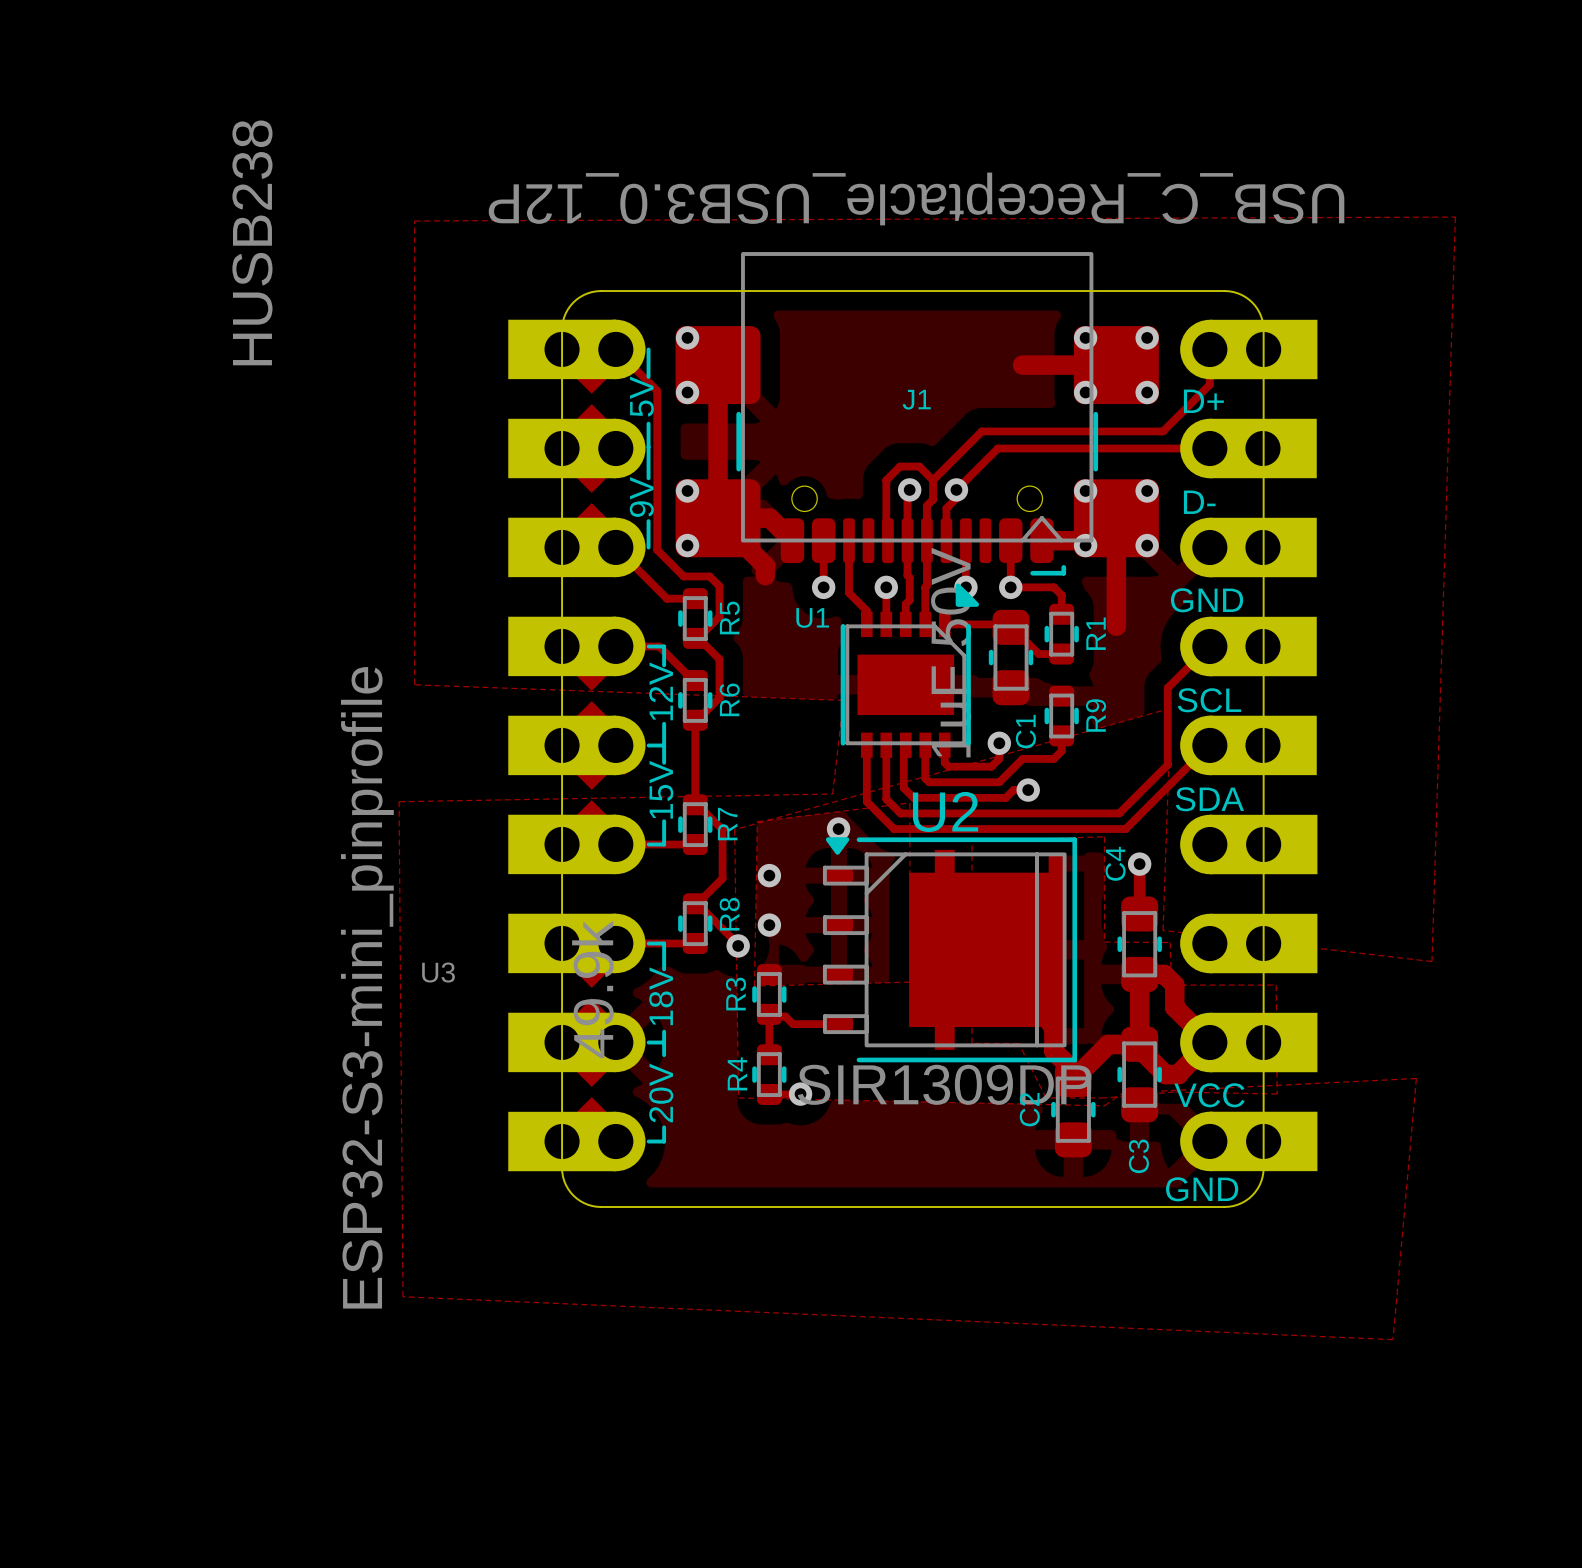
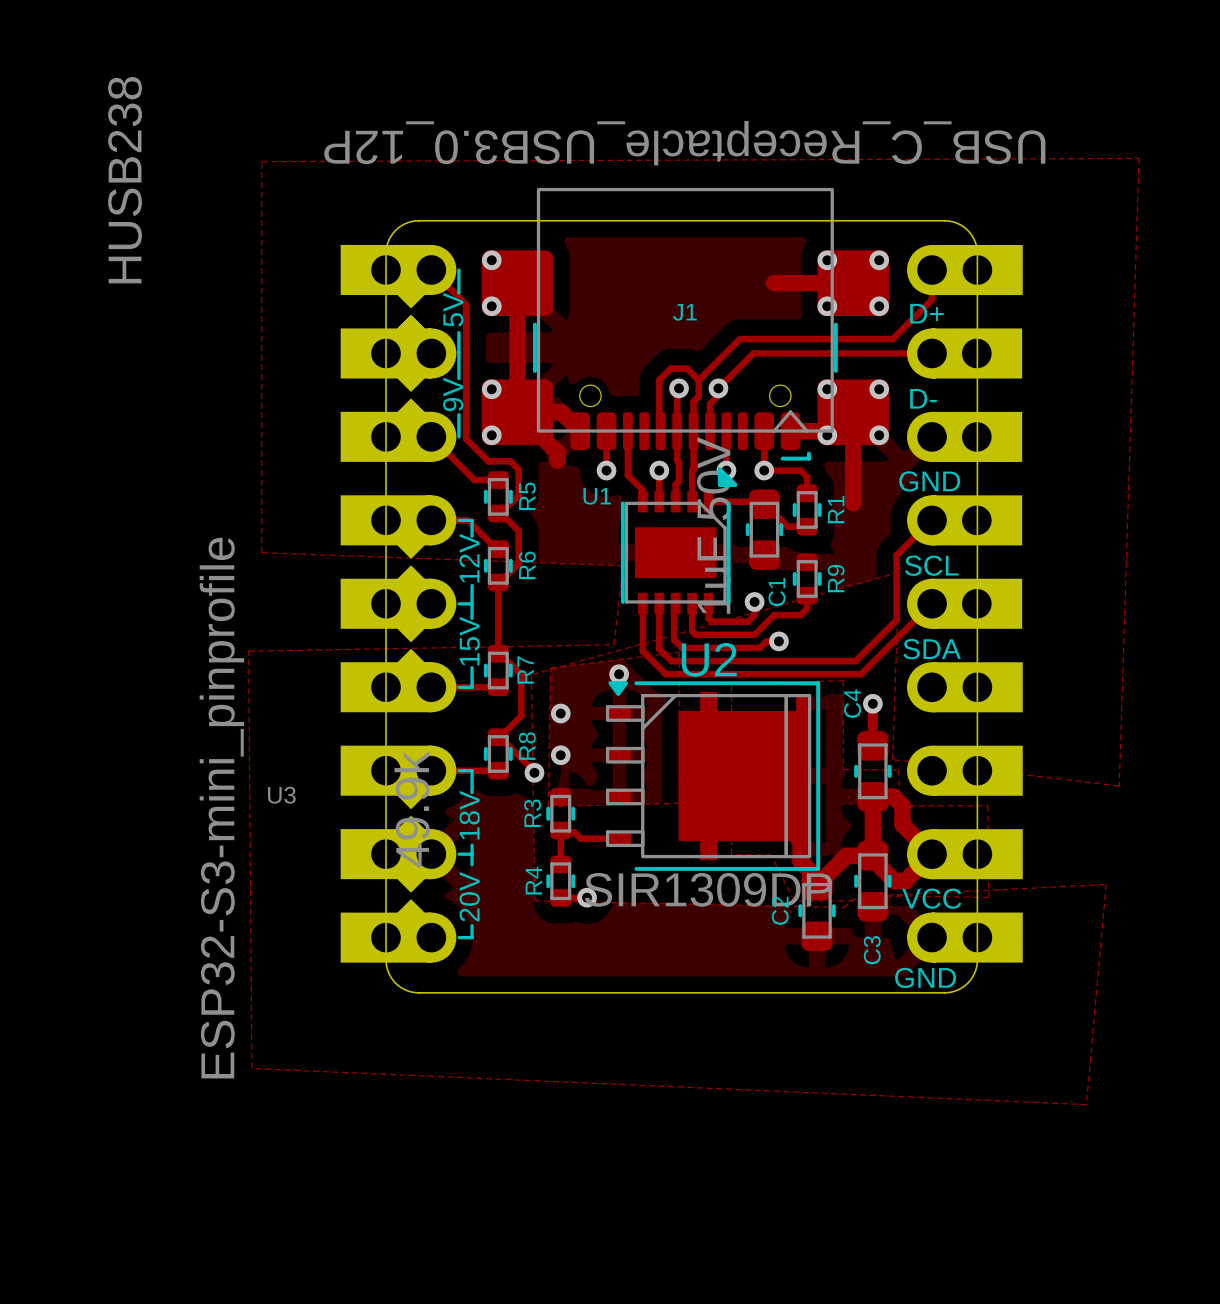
U3 footprint: [508, 290, 1318, 1208] -> [340, 219, 1023, 994]

